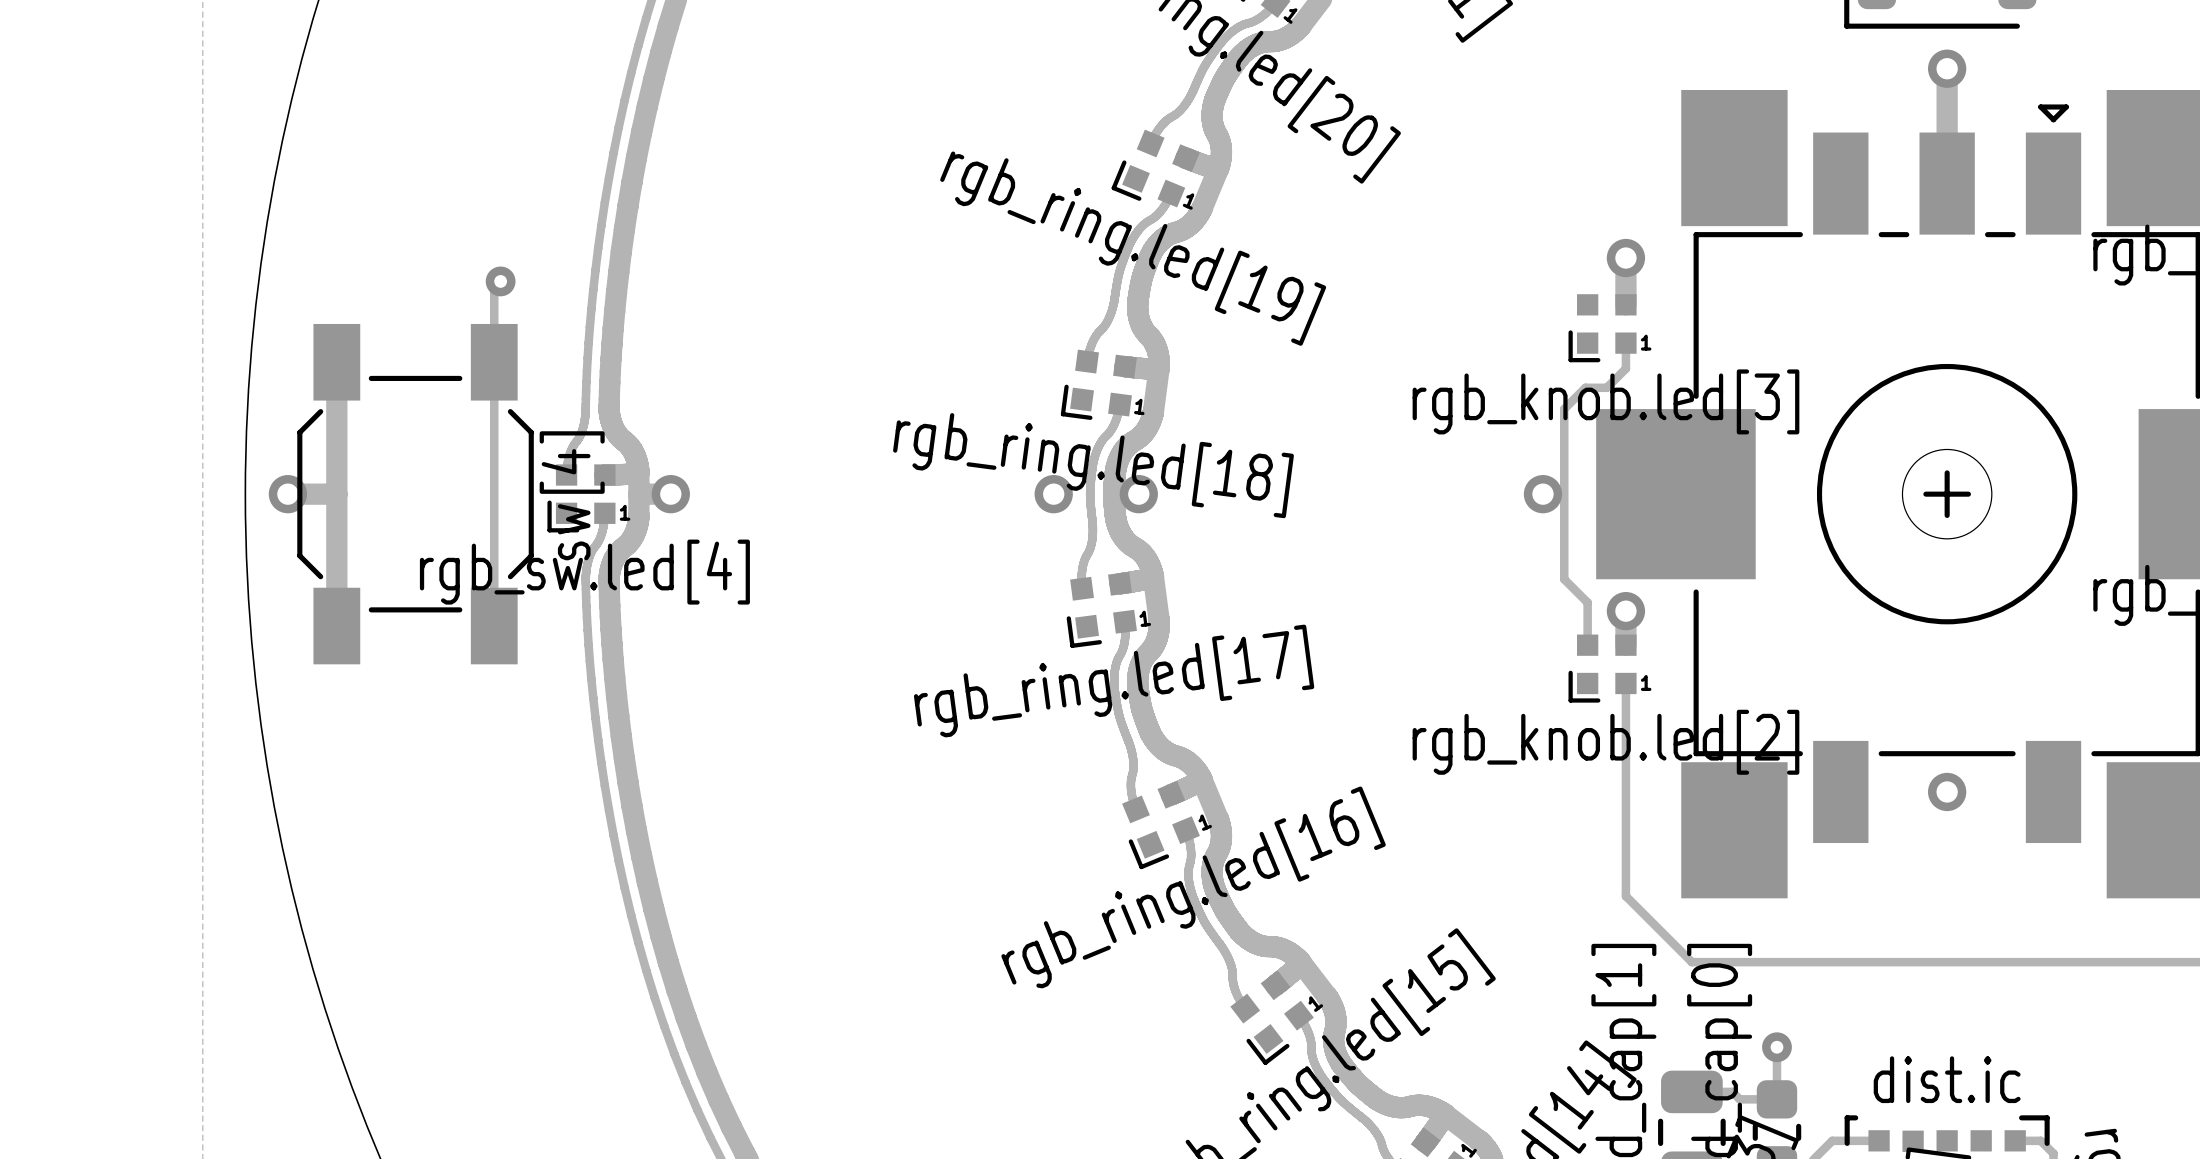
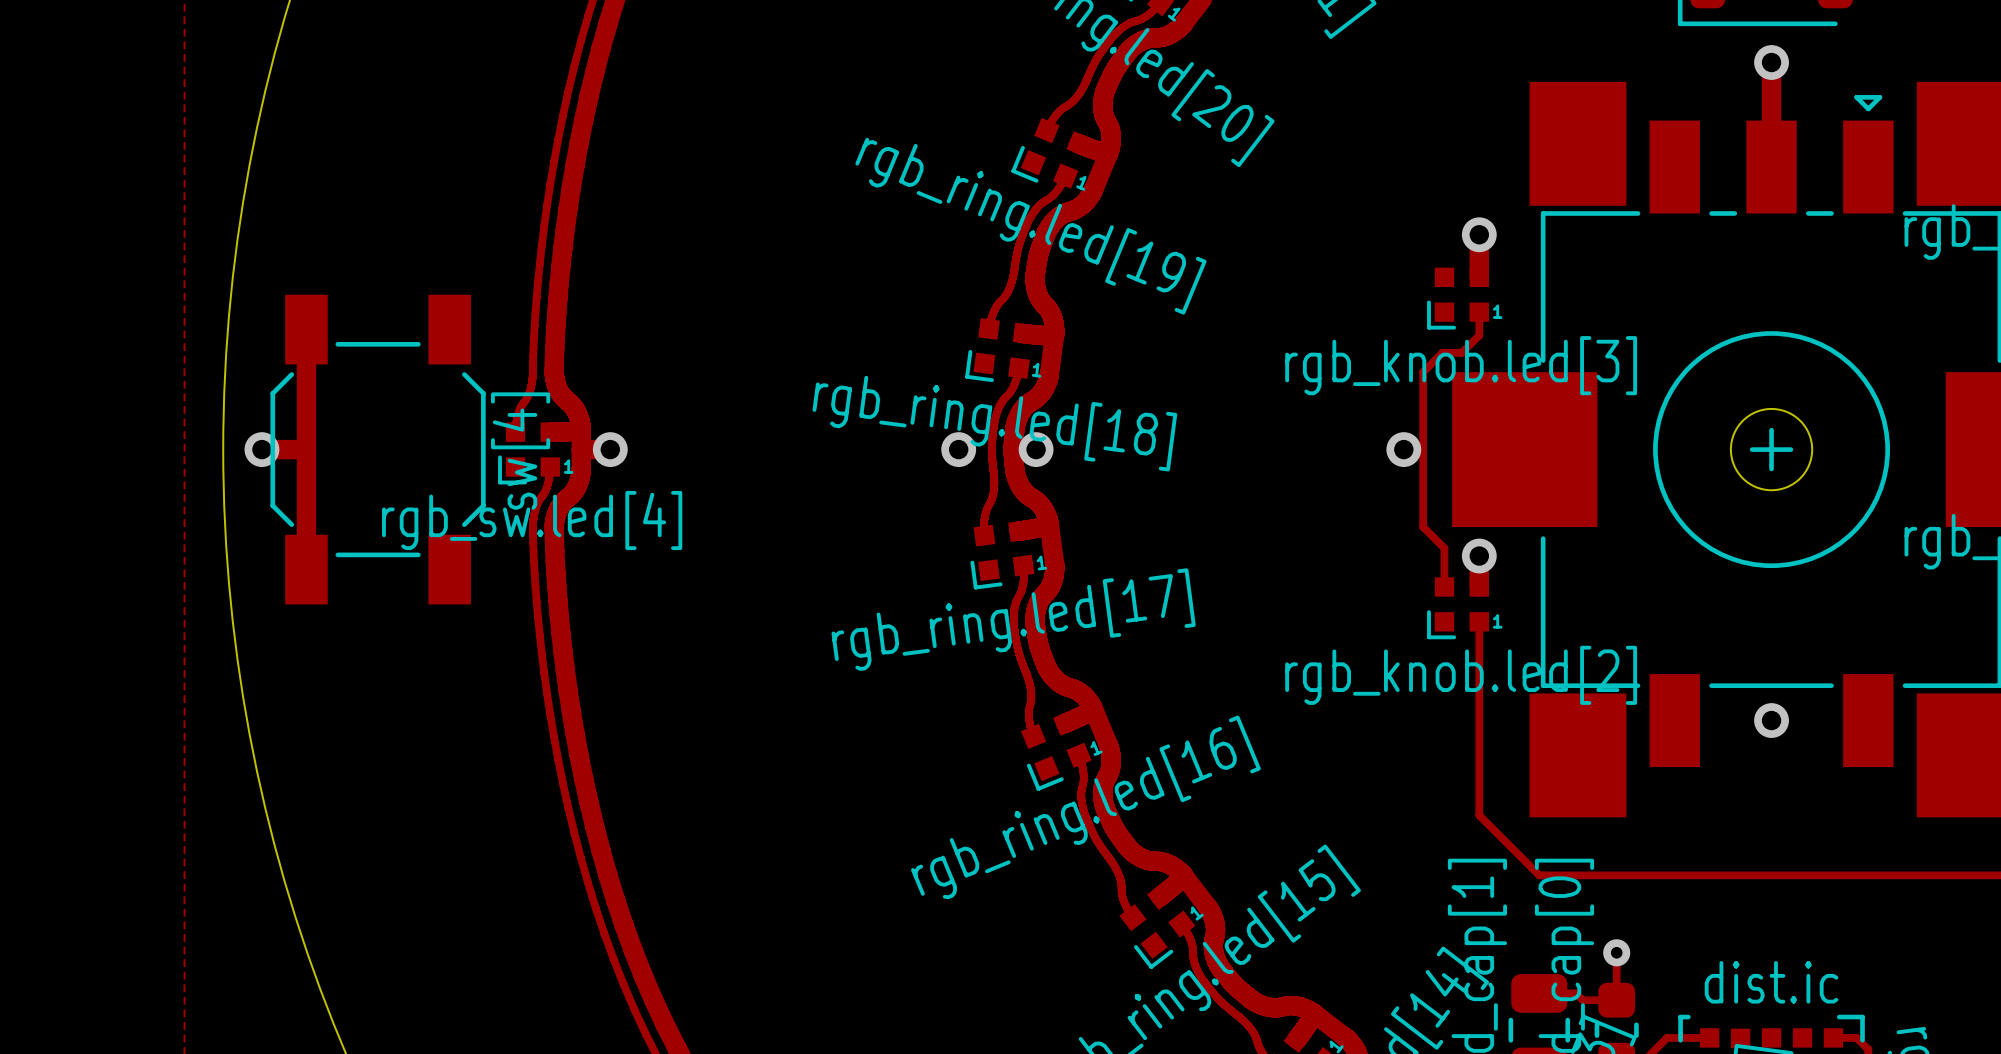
track: (500, 281) (494, 287) (494, 626) -> none
via: (500, 281) -> none

